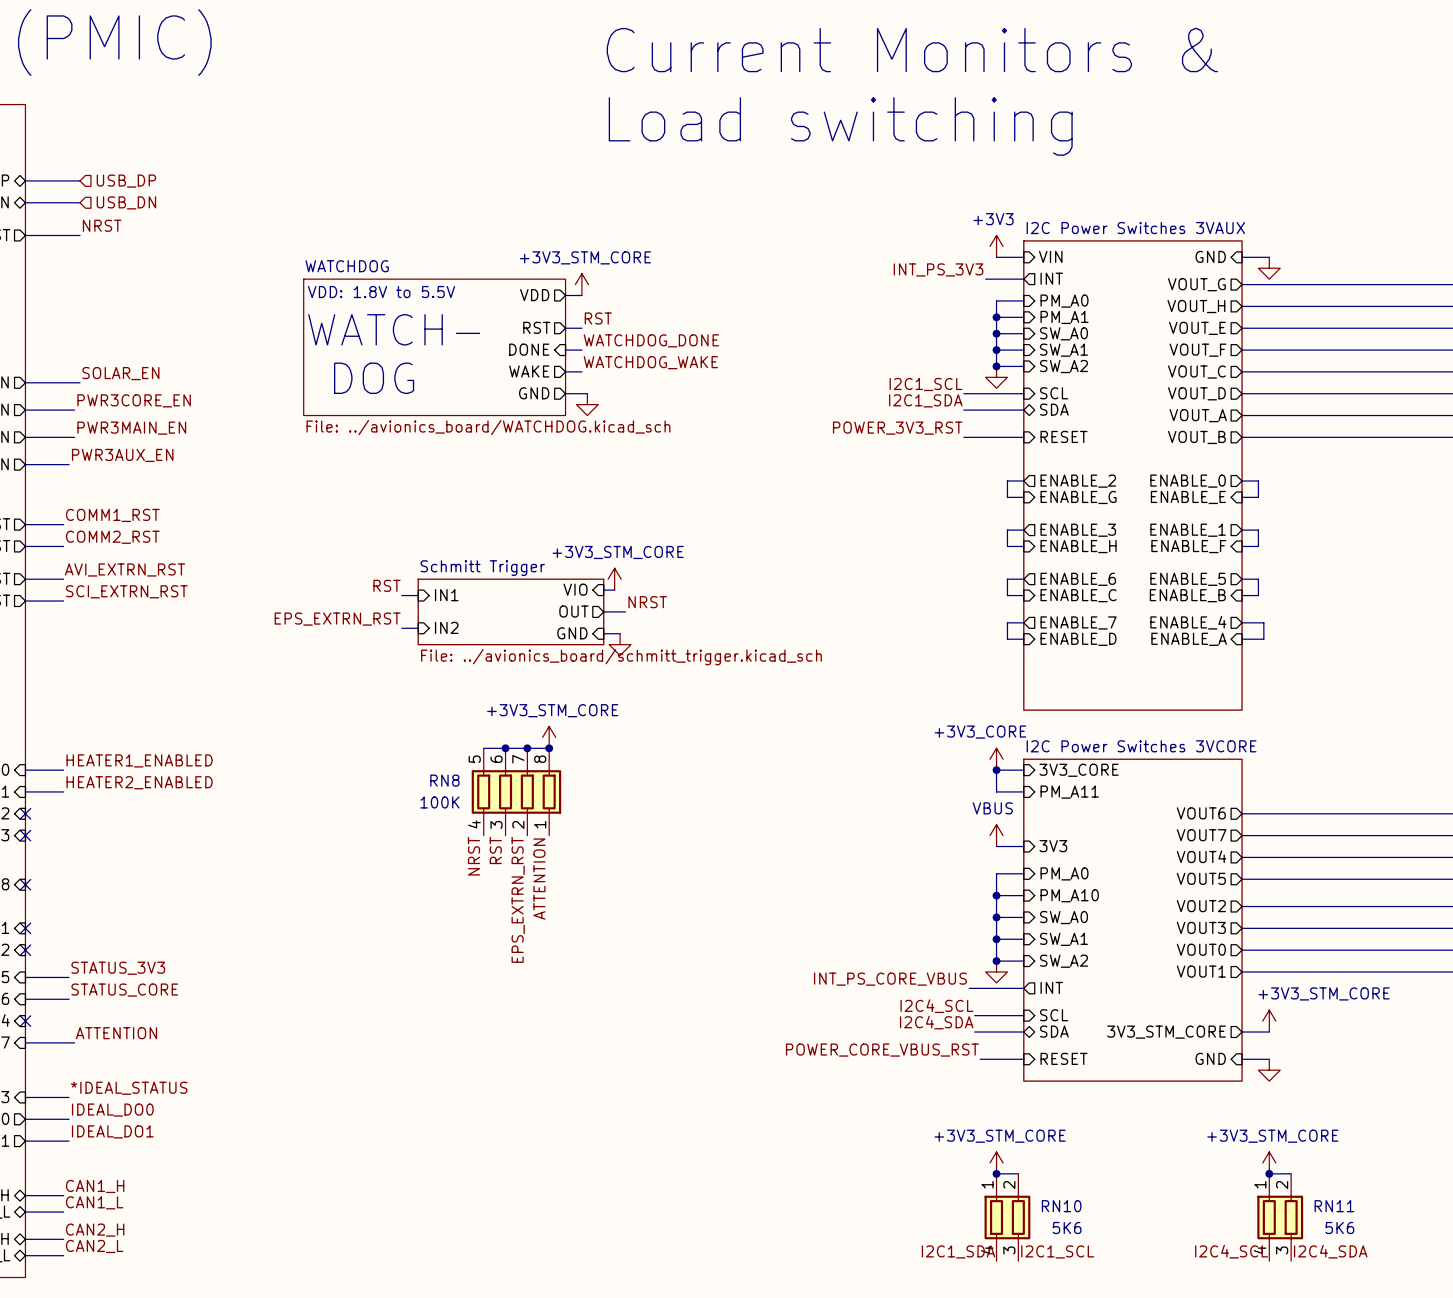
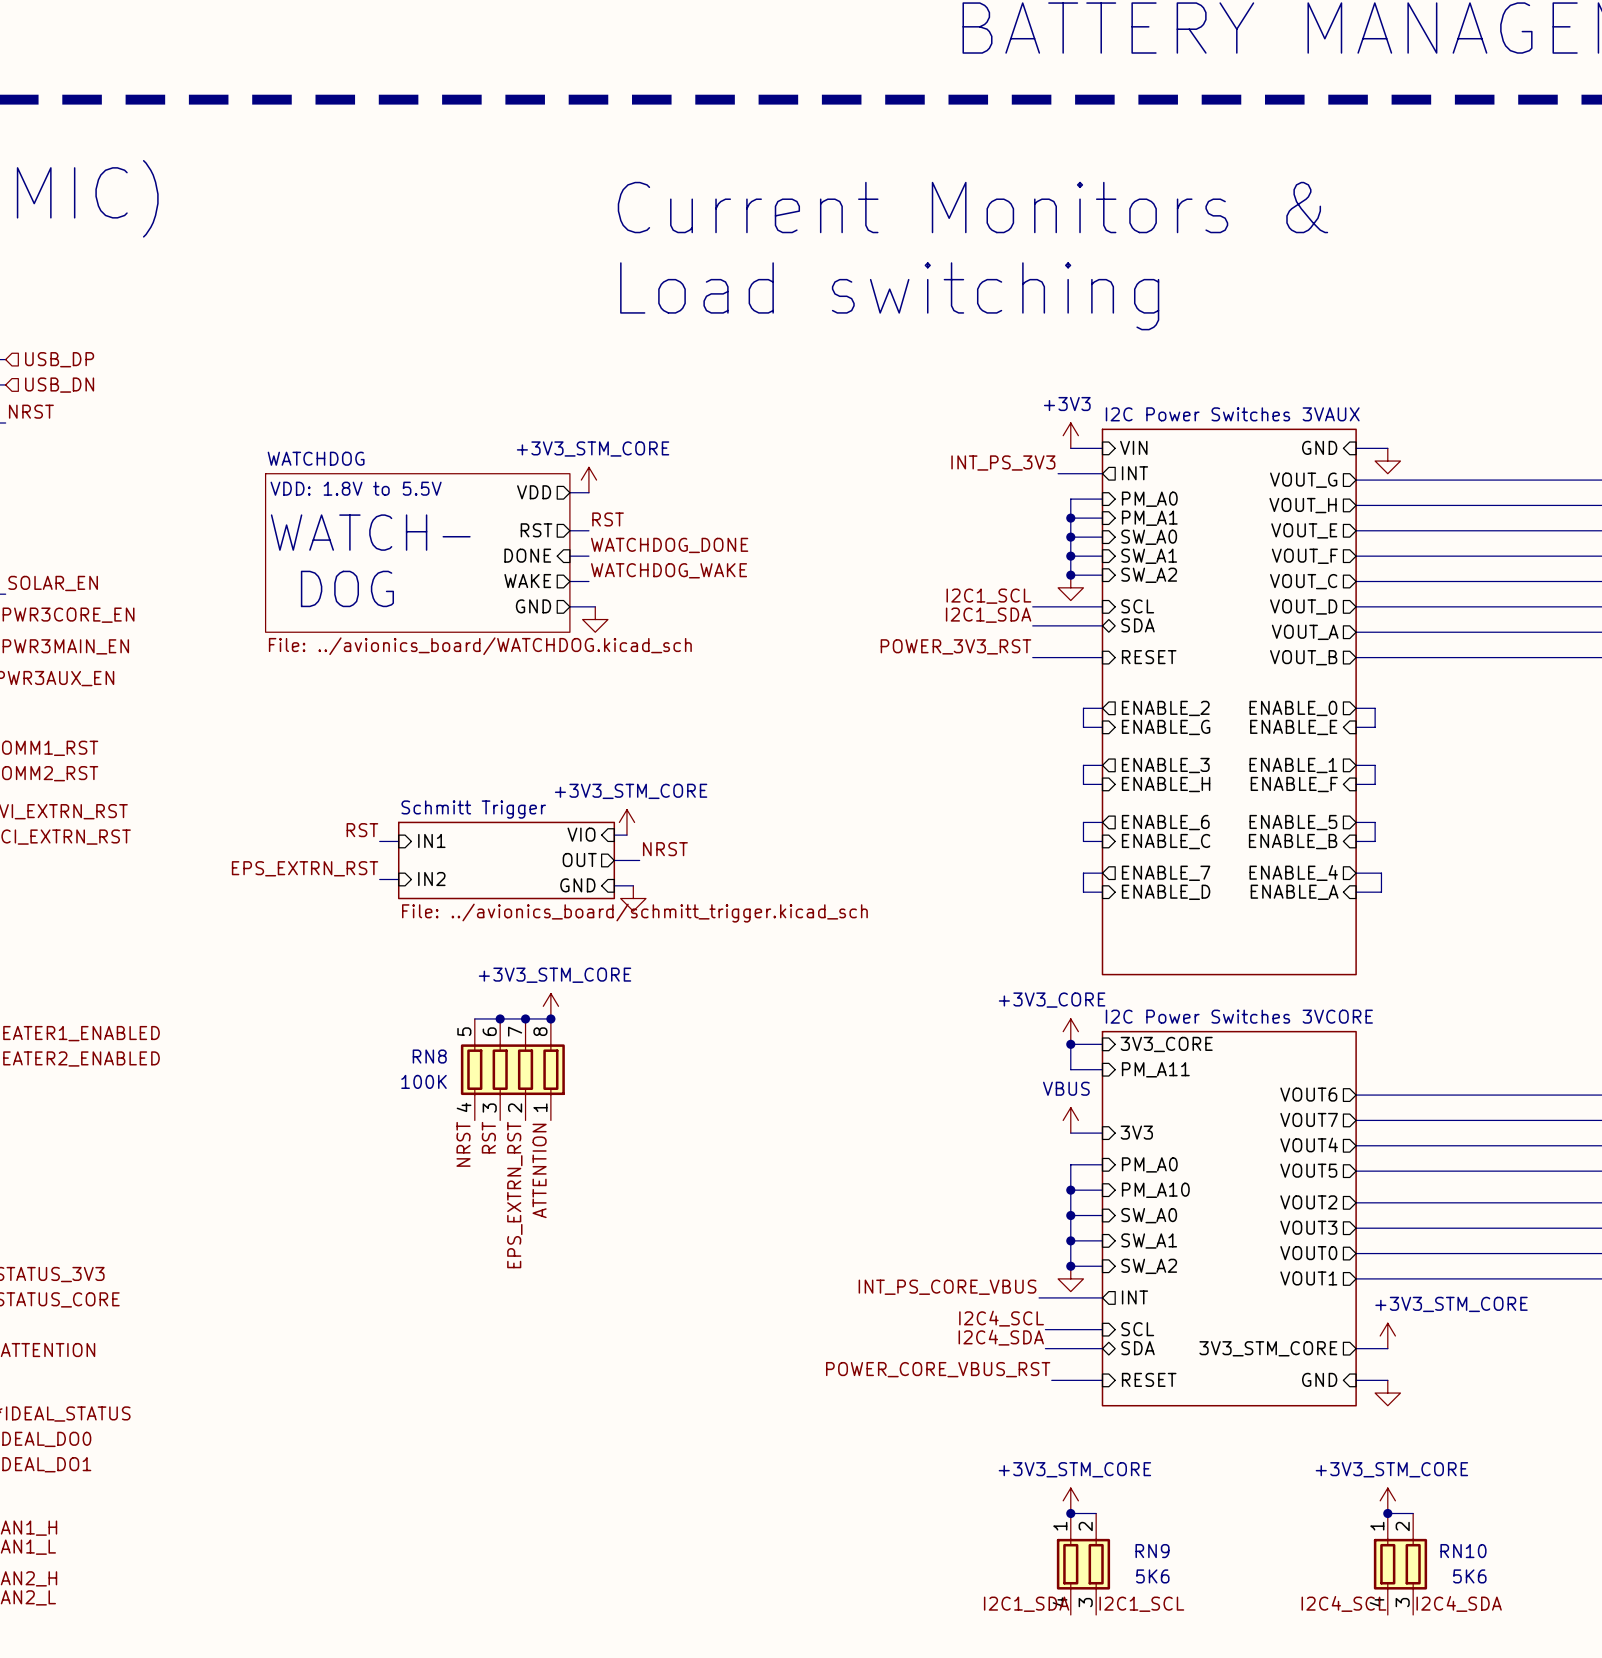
RN10 name: RN10 (1061, 1206) -> RN9 (1152, 1551)
RN11 name: RN11 (1334, 1206) -> RN10 (1463, 1551)

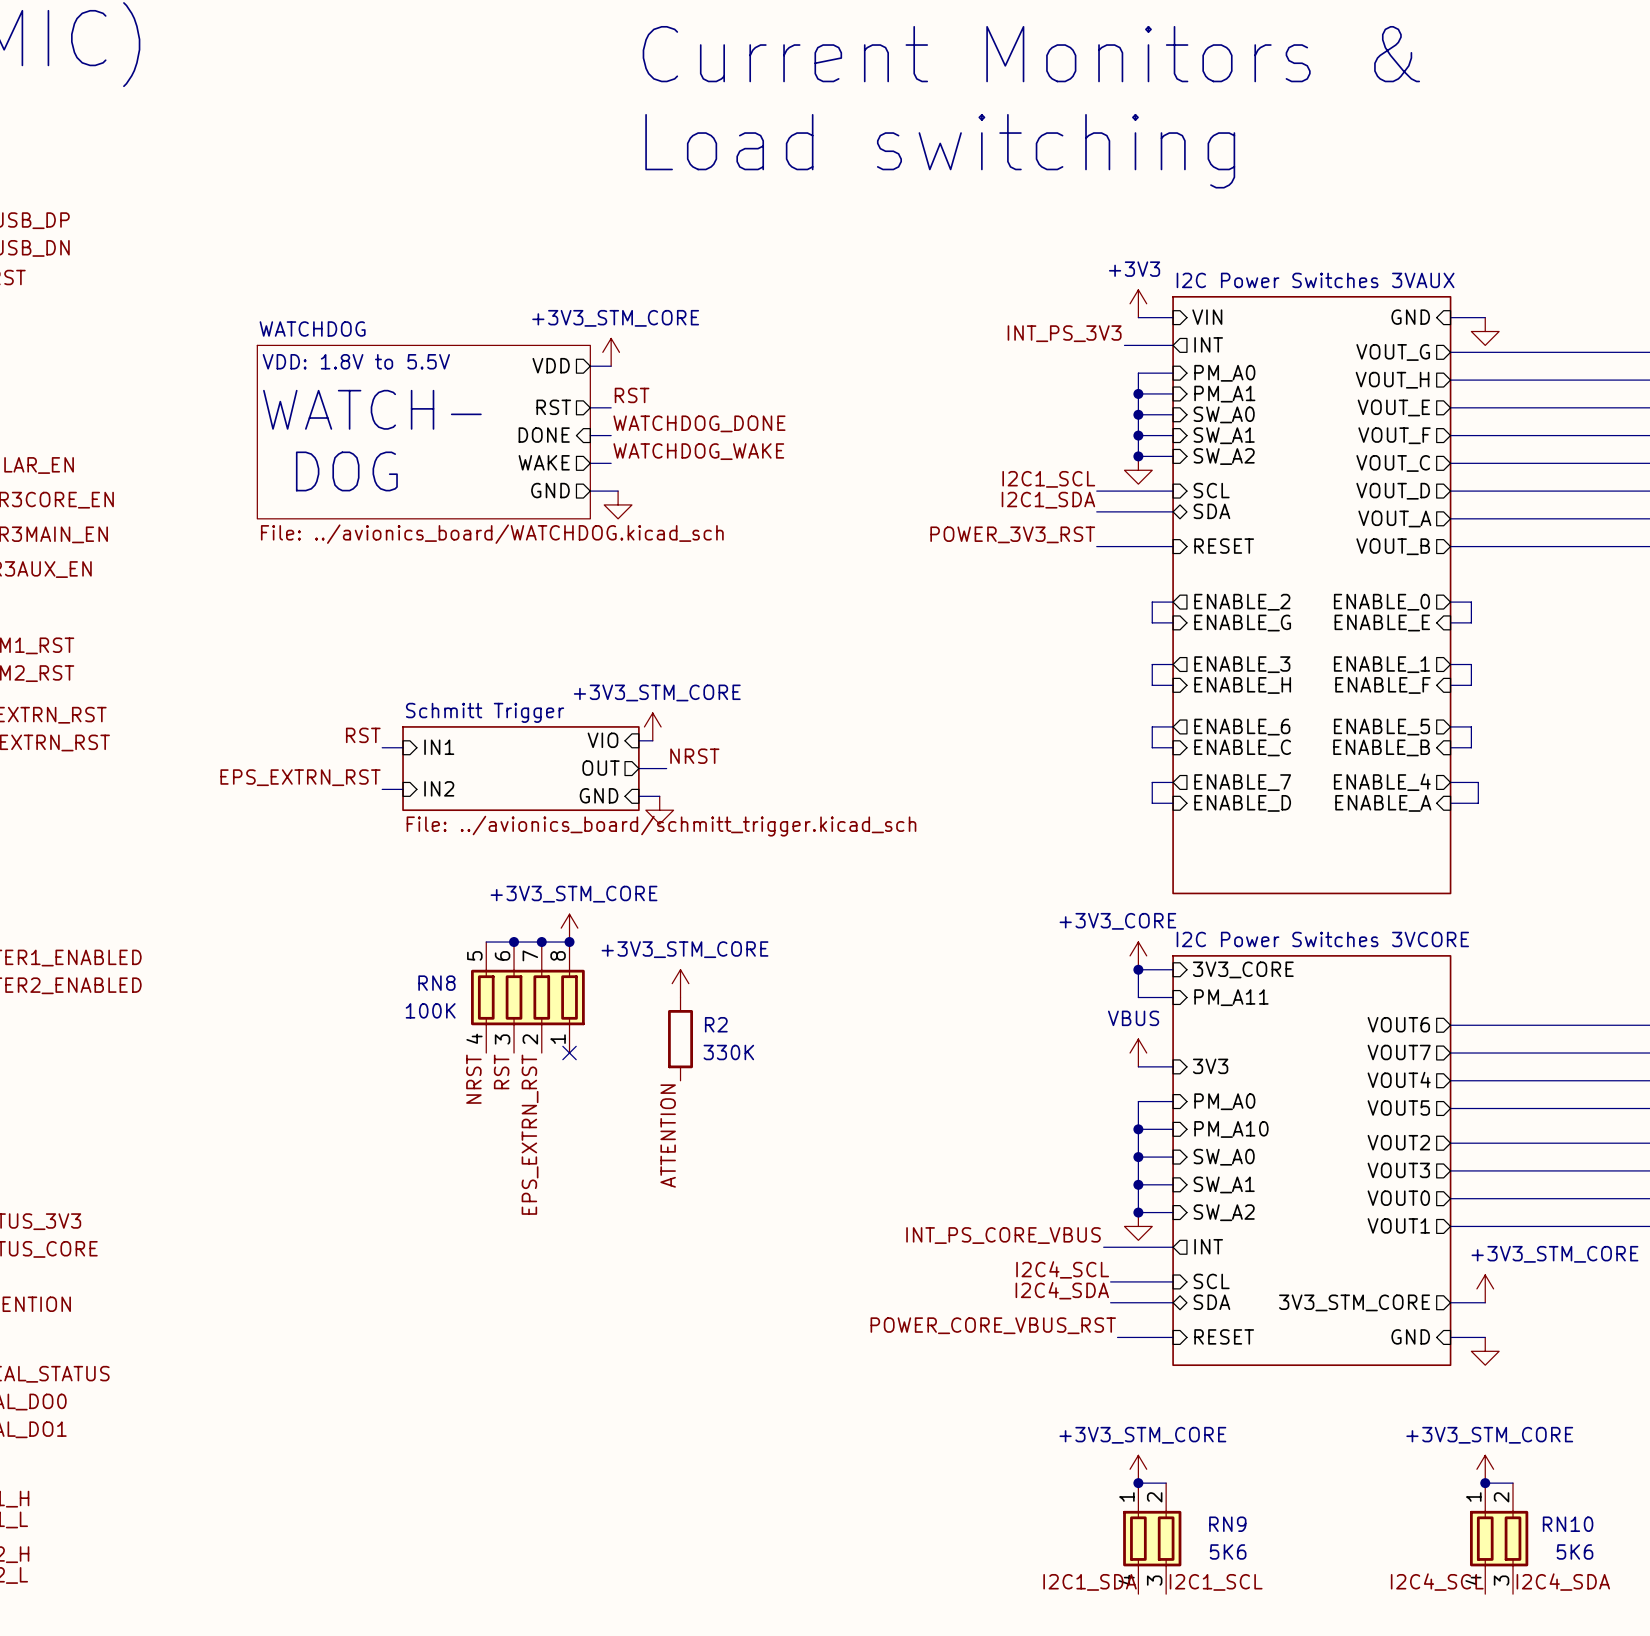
power symbol: none -> +3V3_STM_CORE (680, 983)
R2: none -> 330K (680, 1039)
no-connect mark: none -> (569, 1053)
label position: ATTENTION (539, 1170) -> ATTENTION (668, 1136)

